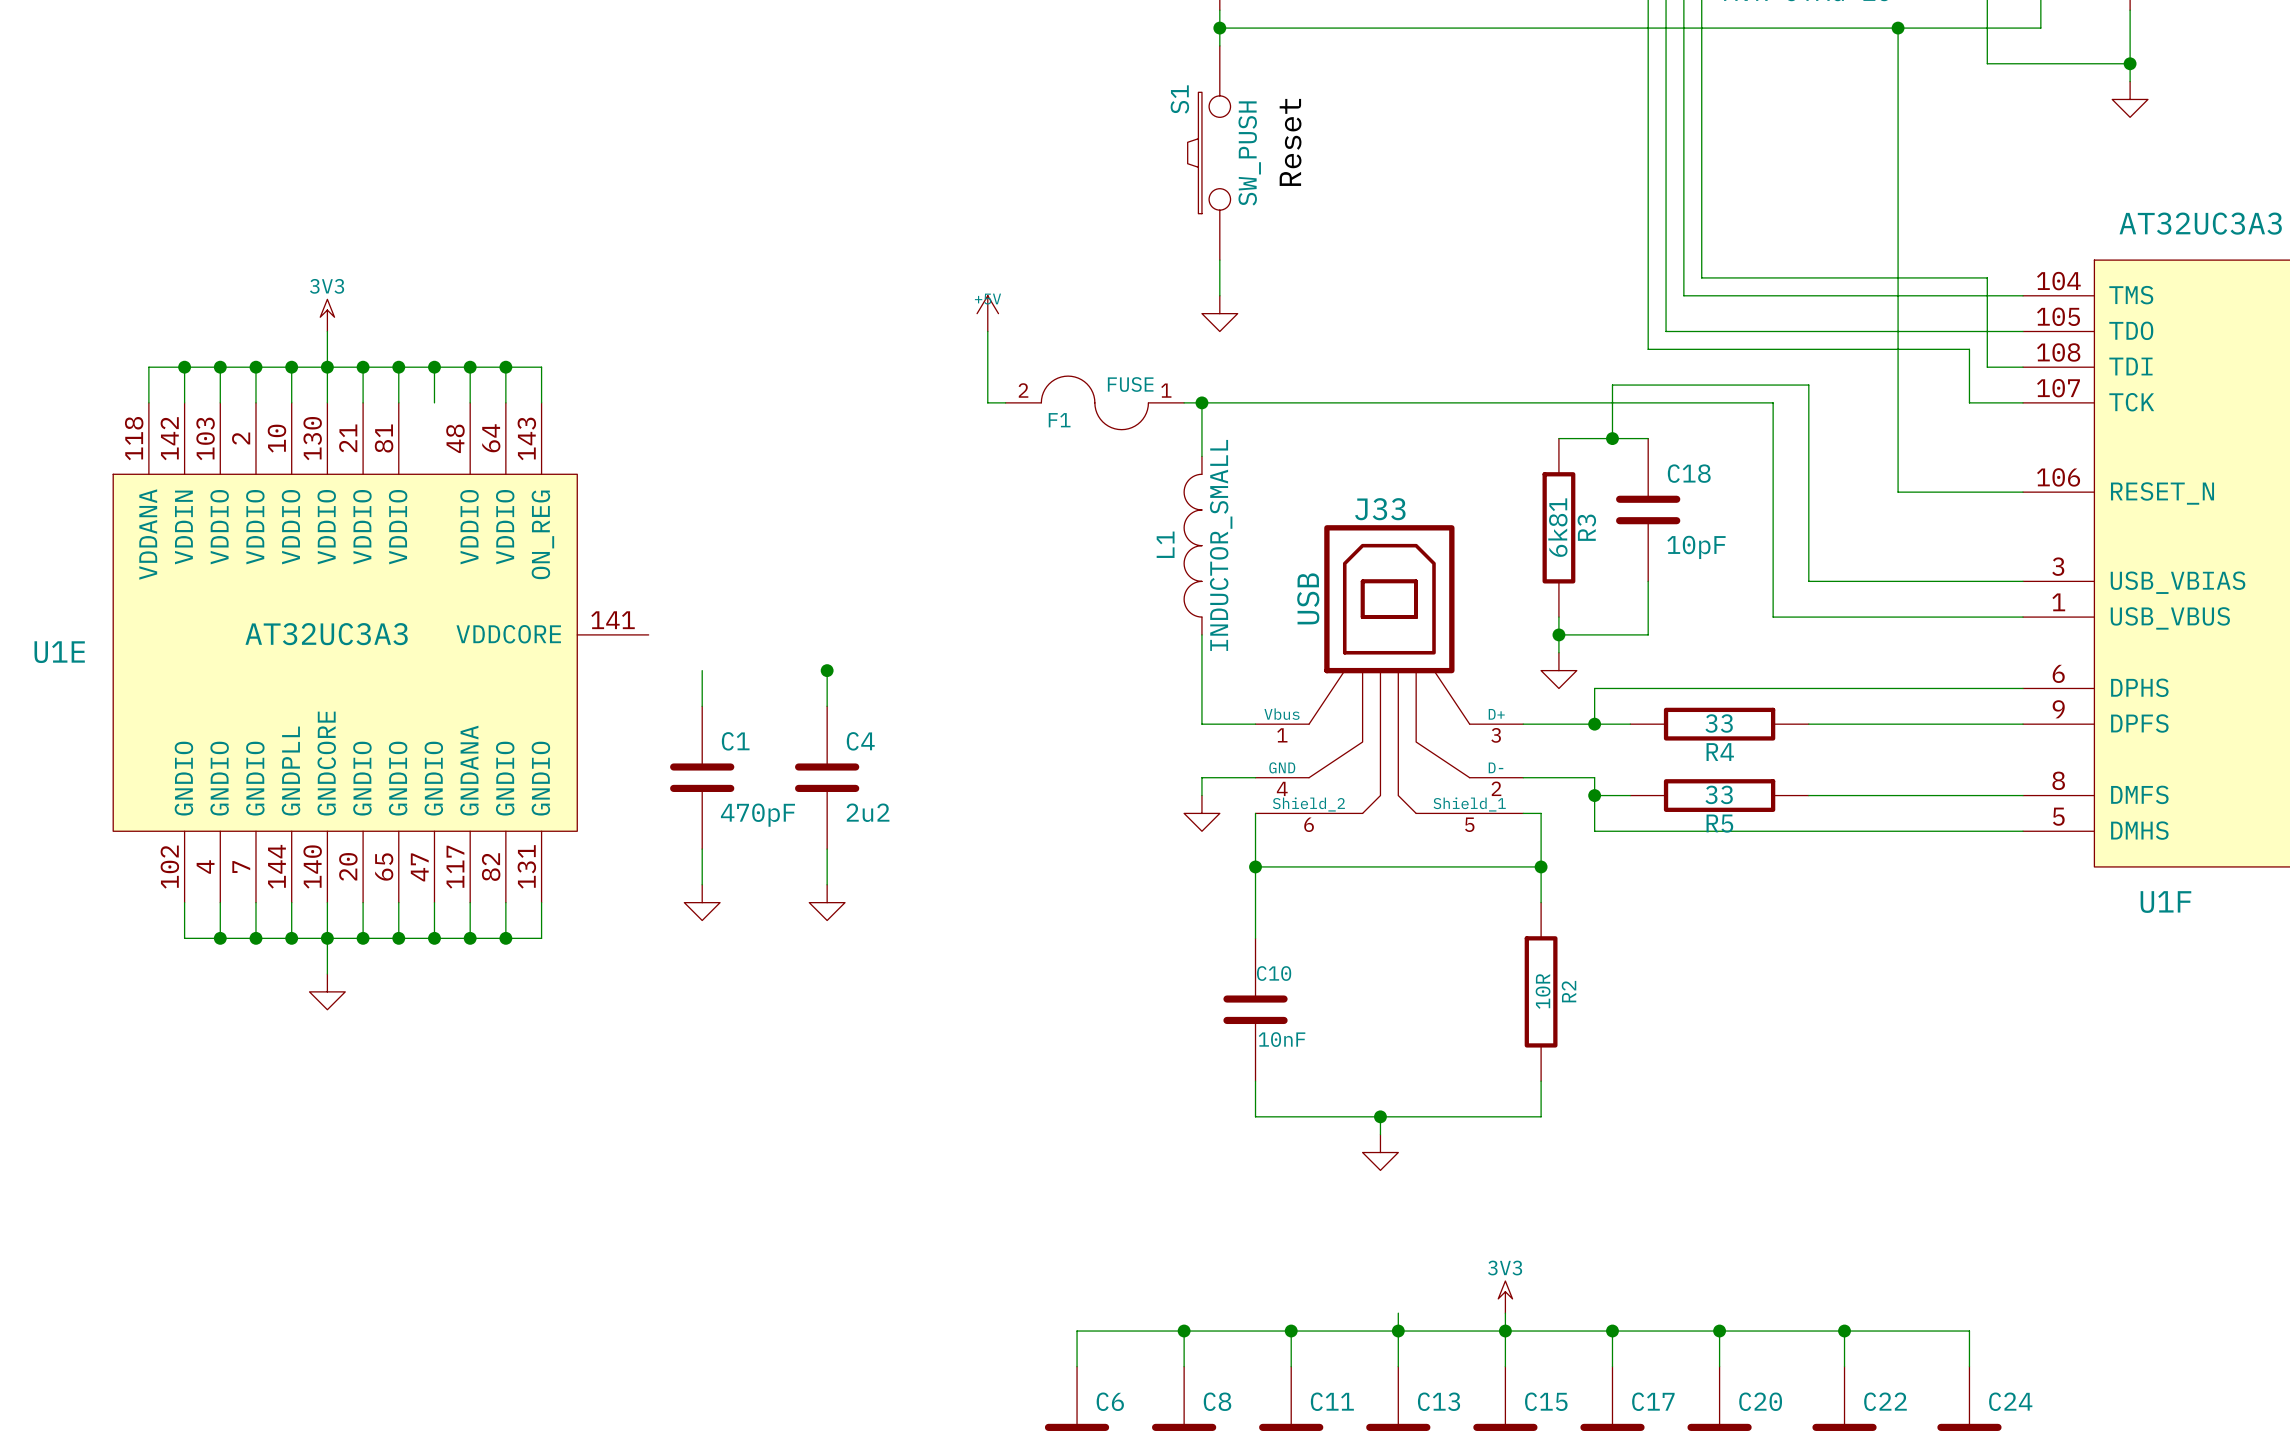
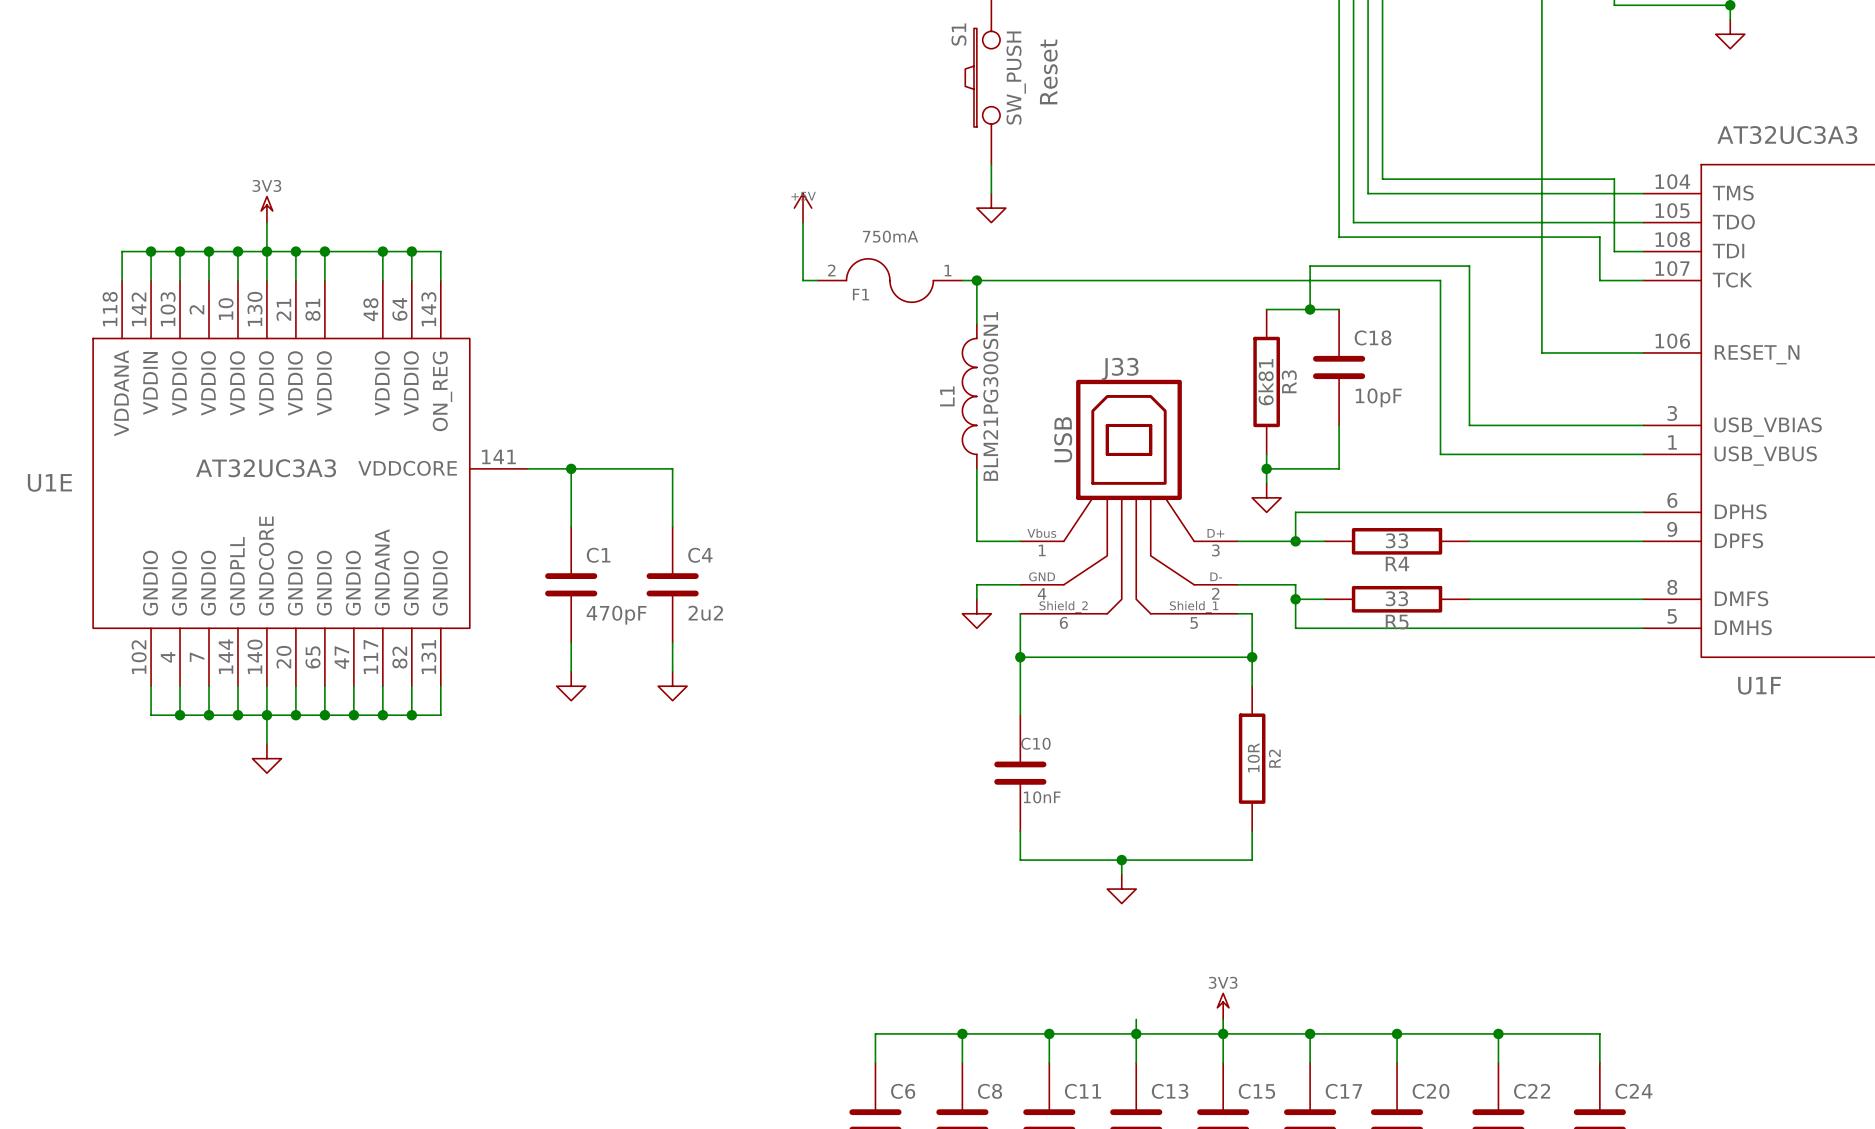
wire: (434, 367) (434, 402) -> none
junction: (434, 367) -> none
F1 value: FUSE (1130, 384) -> 750mA (890, 236)
L1 value: INDUCTOR_SMALL (1221, 545) -> BLM21PG300SN1 (990, 396)
wire: none -> (527, 468) (672, 468) (672, 497)
wire: none -> (571, 468) (571, 497)
junction: none -> (571, 468)
junction: (827, 670) -> none

